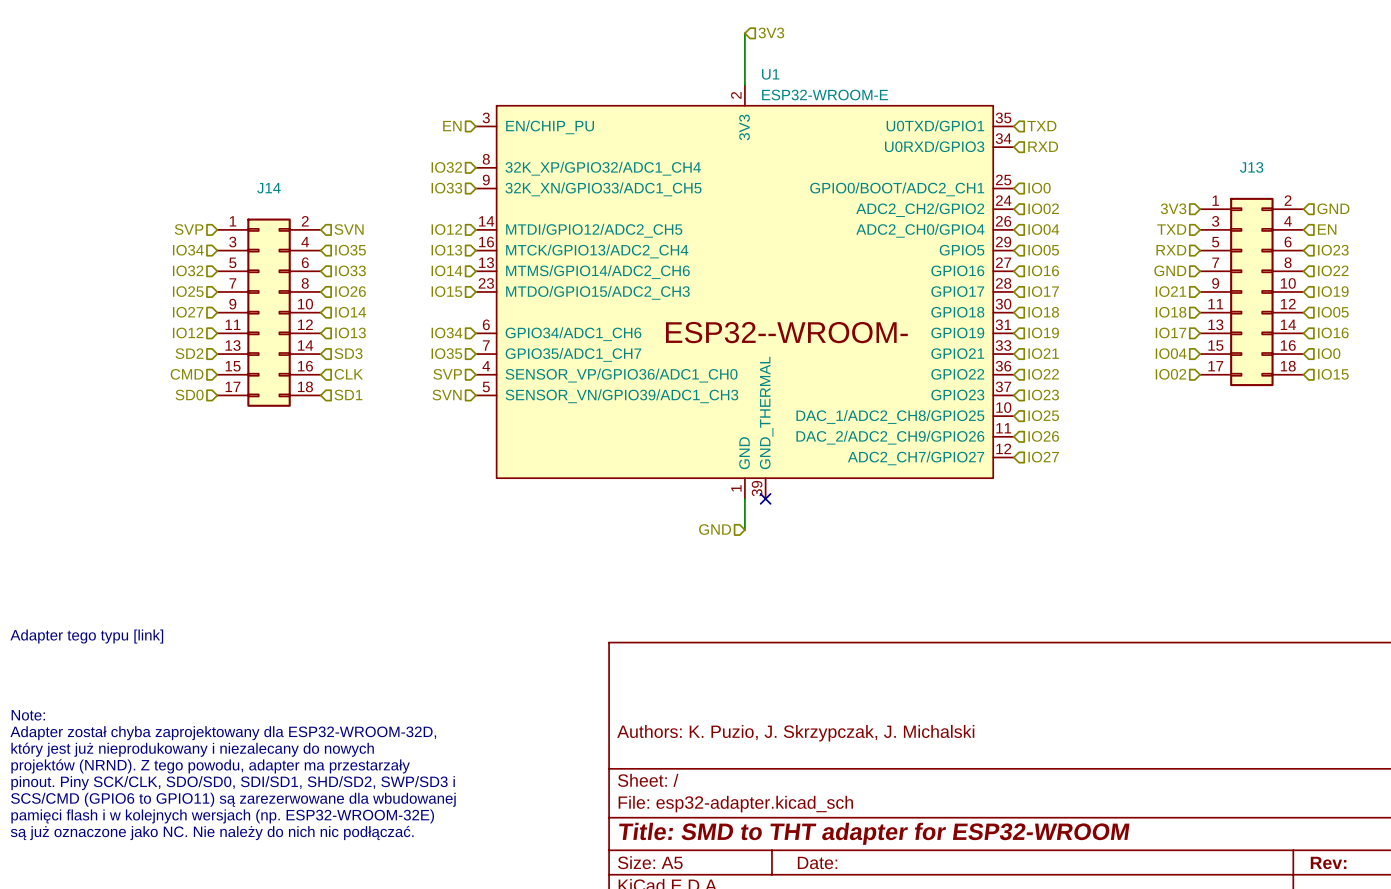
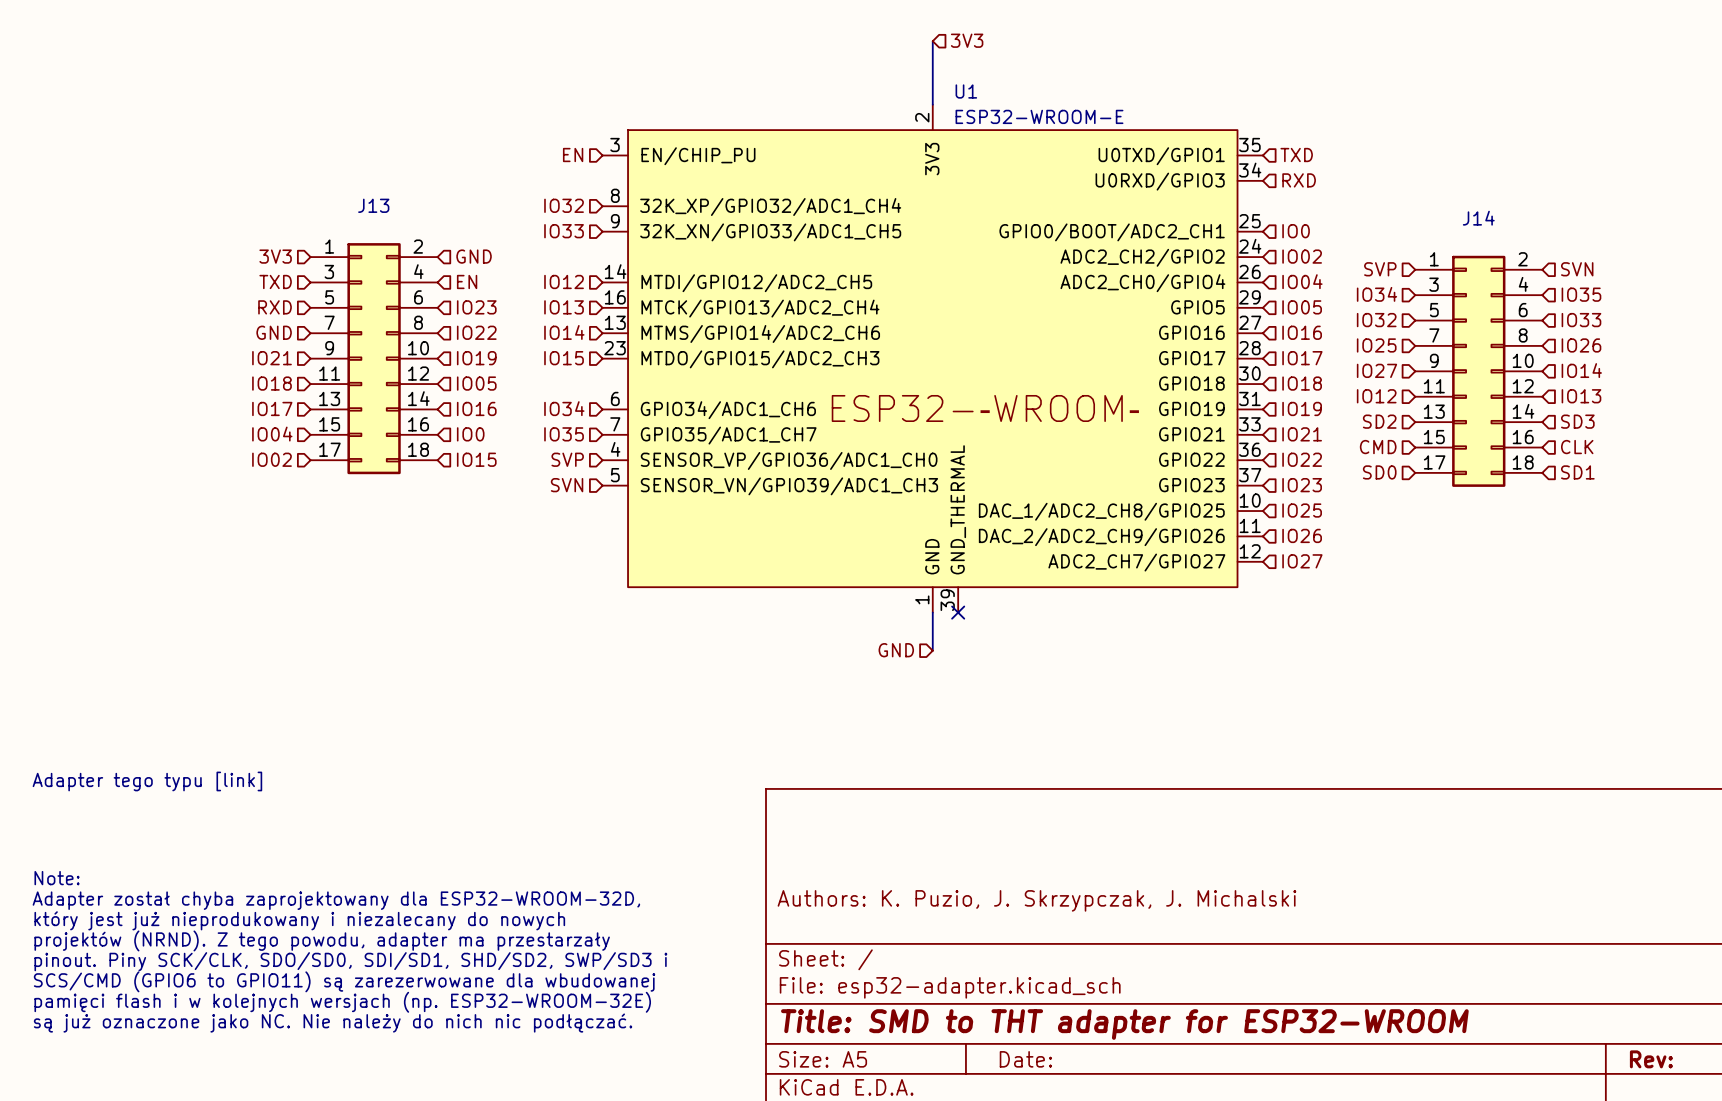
hierarchical label: none -> 3V3 (275, 256)
hierarchical label: none -> GND (474, 256)
hierarchical label: 3V3 (1173, 208) -> none
hierarchical label: GND (1333, 208) -> none
hierarchical label: none -> SVP (1380, 269)
hierarchical label: none -> SVN (1577, 269)
hierarchical label: SVP (189, 229) -> none
hierarchical label: none -> TXD (275, 281)
hierarchical label: SVN (349, 229) -> none
hierarchical label: none -> EN (467, 281)
hierarchical label: TXD (1171, 229) -> none
hierarchical label: EN (1327, 229) -> none
hierarchical label: none -> IO34 (1376, 294)
hierarchical label: none -> IO35 (1581, 294)
hierarchical label: IO34 (188, 250) -> none
hierarchical label: none -> RXD (275, 307)
hierarchical label: IO35 (350, 250) -> none
hierarchical label: none -> IO23 (476, 307)
hierarchical label: RXD (1171, 250) -> none
hierarchical label: IO23 (1333, 250) -> none
hierarchical label: none -> IO32 (1376, 320)
hierarchical label: none -> IO33 (1581, 320)
hierarchical label: IO32 (188, 270) -> none
hierarchical label: none -> GND (274, 332)
hierarchical label: IO33 (350, 270) -> none
hierarchical label: GND (1170, 270) -> none
hierarchical label: IO22 (1333, 270) -> none
hierarchical label: none -> IO25 (1376, 345)
hierarchical label: none -> IO26 (1581, 345)
hierarchical label: IO25 (188, 291) -> none
hierarchical label: none -> IO21 (271, 358)
hierarchical label: IO26 (350, 291) -> IO22 (476, 332)
hierarchical label: none -> IO19 (476, 358)
hierarchical label: IO21 (1171, 291) -> none
J13 position: (1251, 291) -> (374, 358)
hierarchical label: IO19 (1333, 291) -> none
hierarchical label: none -> IO27 (1376, 370)
hierarchical label: none -> IO14 (1581, 370)
hierarchical label: IO27 (188, 312) -> none
hierarchical label: none -> IO18 (271, 383)
J14 position: (269, 312) -> (1478, 371)
hierarchical label: IO14 (350, 312) -> none
hierarchical label: none -> IO05 (476, 383)
hierarchical label: IO18 (1171, 312) -> none
hierarchical label: IO05 (1333, 312) -> none
hierarchical label: none -> IO12 (1376, 396)
hierarchical label: none -> IO13 (1581, 396)
hierarchical label: IO12 (188, 332) -> none
hierarchical label: none -> IO17 (272, 408)
hierarchical label: IO13 (350, 332) -> none
hierarchical label: none -> IO16 (476, 408)
hierarchical label: IO17 (1170, 332) -> none
hierarchical label: IO16 (1333, 332) -> none
hierarchical label: none -> SD2 (1379, 421)
hierarchical label: none -> SD3 (1577, 421)
hierarchical label: SD2 (189, 353) -> none
hierarchical label: none -> IO04 (272, 434)
hierarchical label: SD3 (348, 353) -> none
hierarchical label: none -> IO0 (470, 434)
hierarchical label: IO04 (1171, 353) -> none
hierarchical label: IO0 (1329, 353) -> none
hierarchical label: none -> CMD (1378, 447)
hierarchical label: none -> CLK (1577, 447)
hierarchical label: CMD (187, 374) -> none
hierarchical label: none -> IO02 (271, 459)
hierarchical label: CLK (348, 374) -> none
hierarchical label: none -> IO15 (476, 459)
hierarchical label: IO02 (1170, 374) -> none
hierarchical label: IO15 (1333, 374) -> none
hierarchical label: none -> SD0 (1379, 472)
hierarchical label: none -> SD1 (1577, 472)
hierarchical label: SD0 (189, 395) -> none
hierarchical label: SD1 (348, 395) -> none

